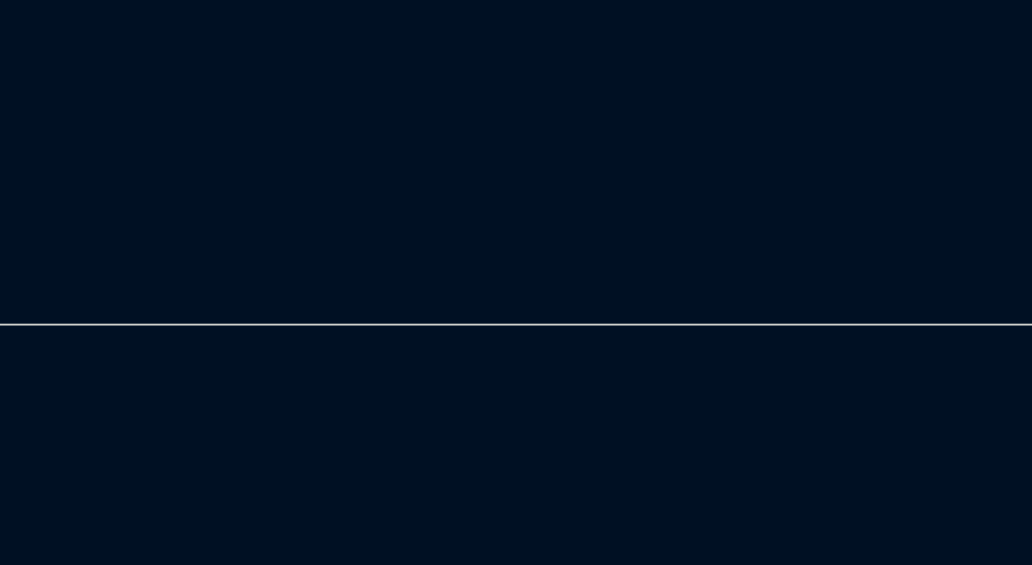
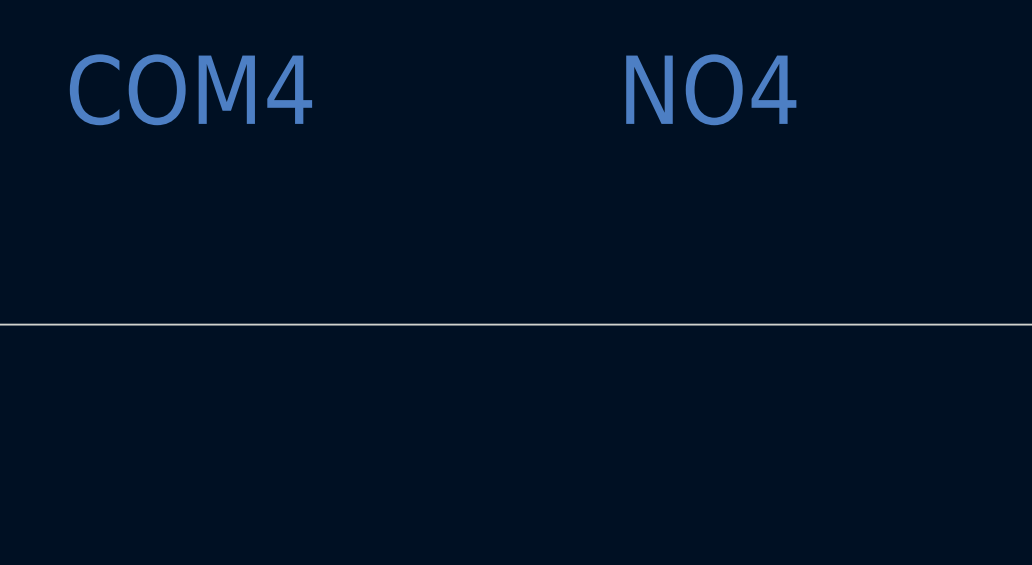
text: none -> COM4 (190, 89)
text: none -> NO4 (711, 89)

